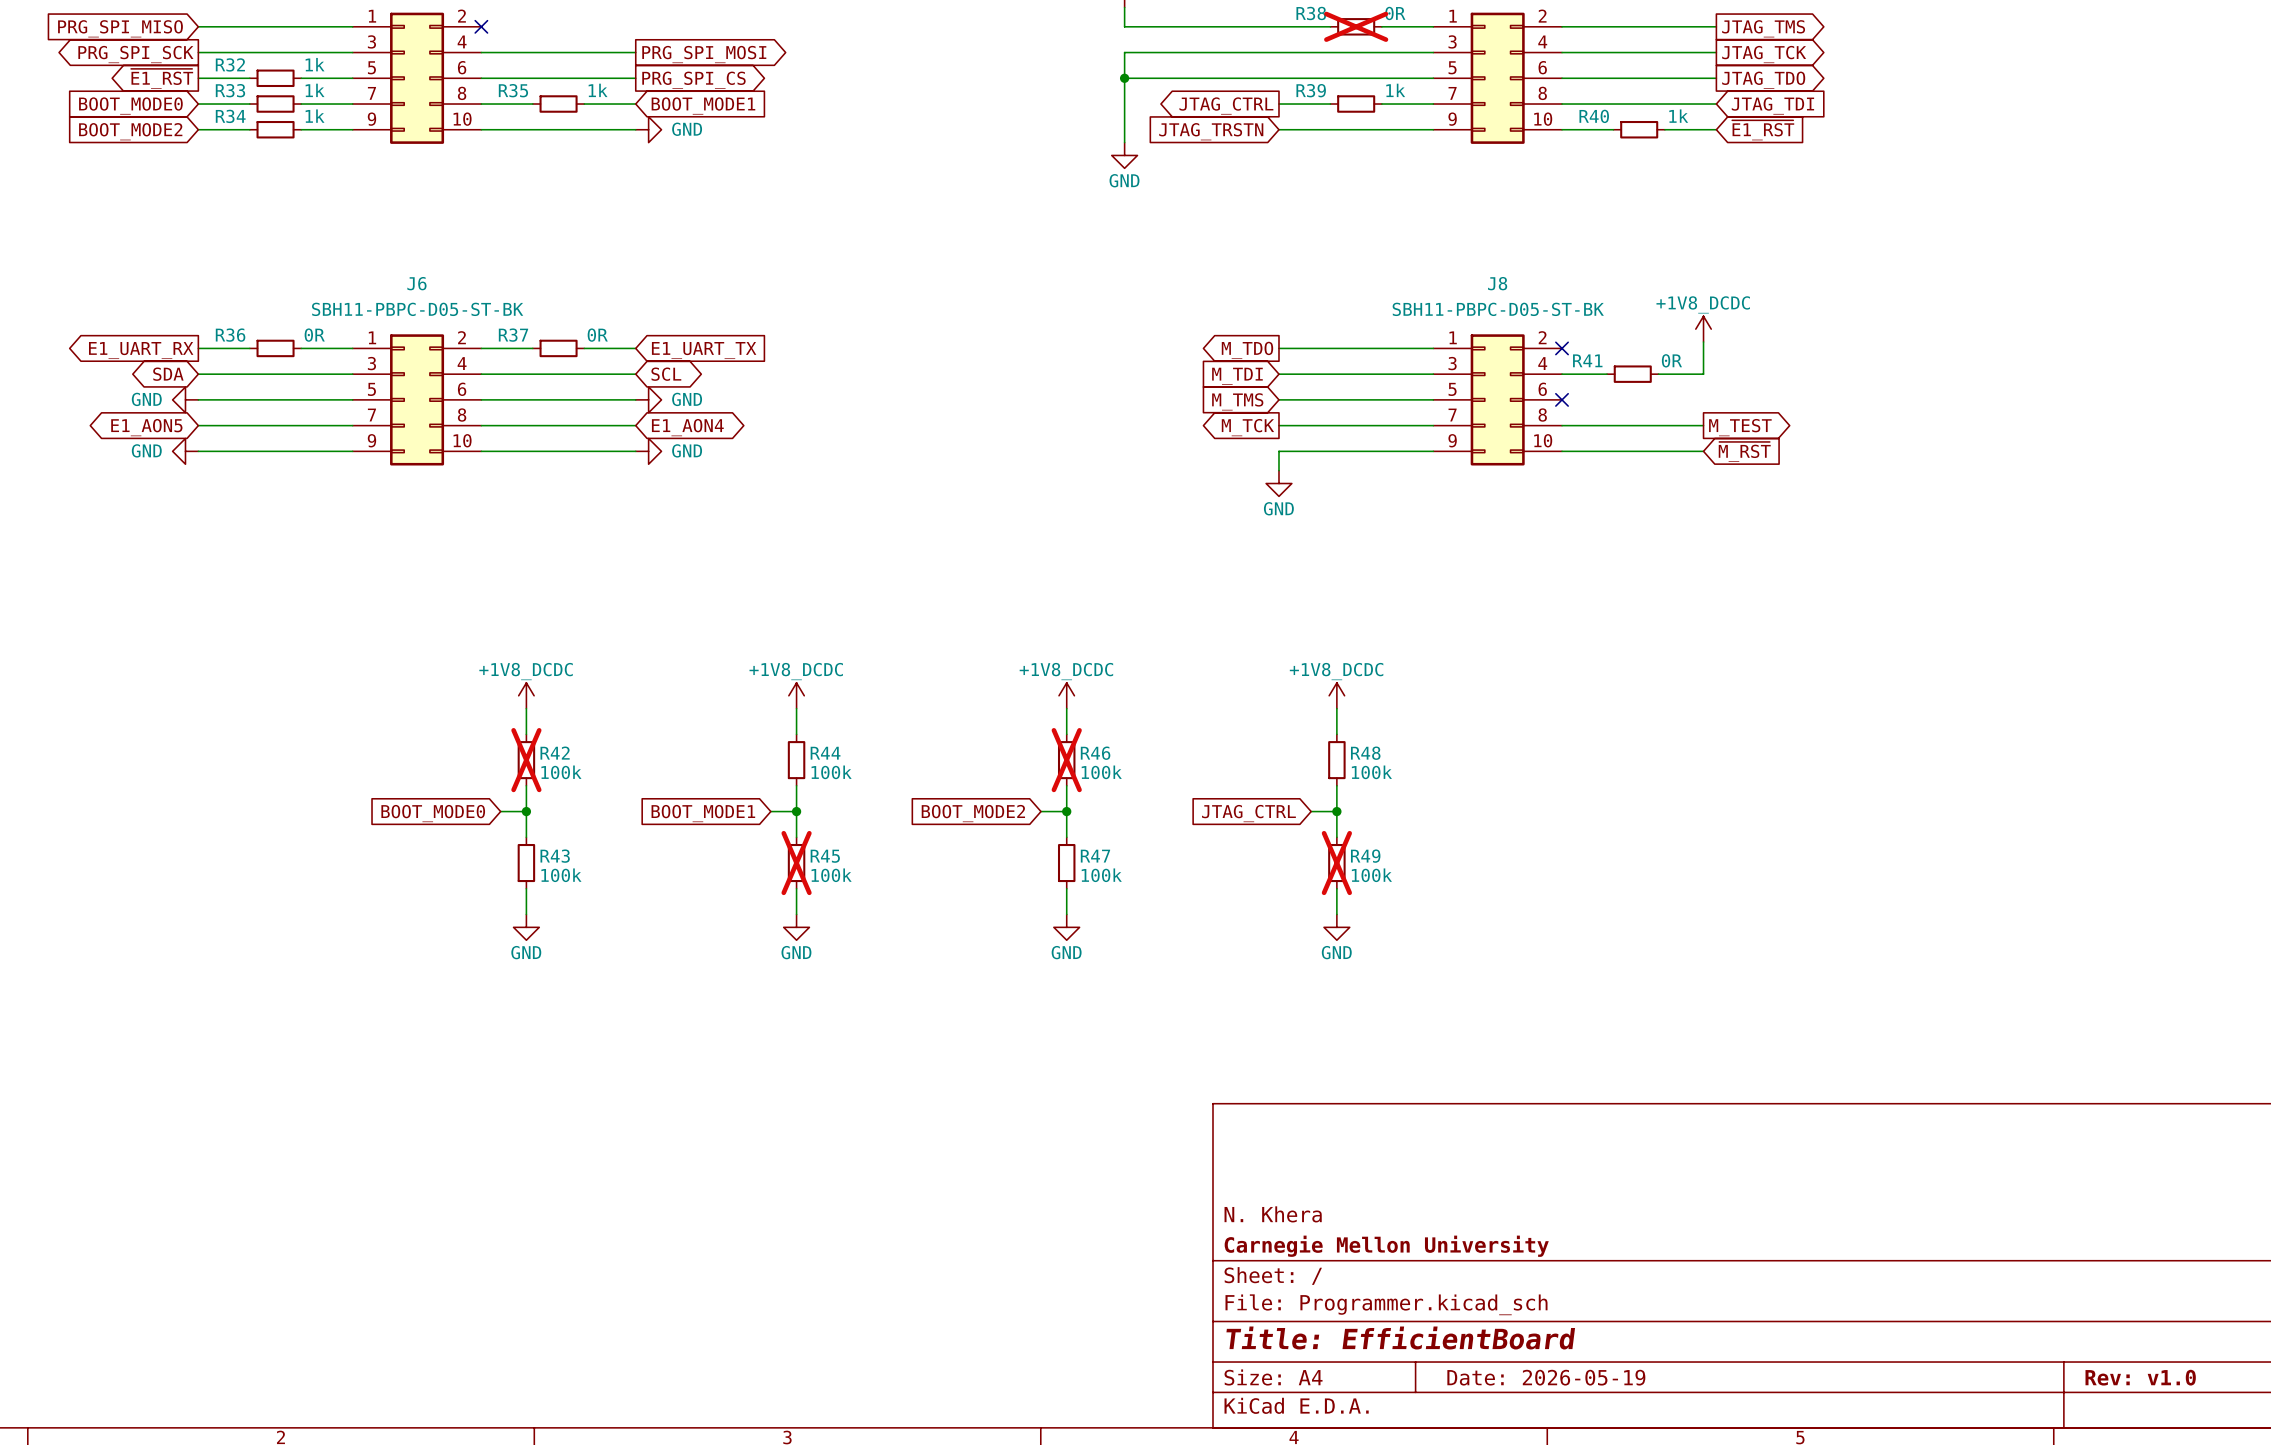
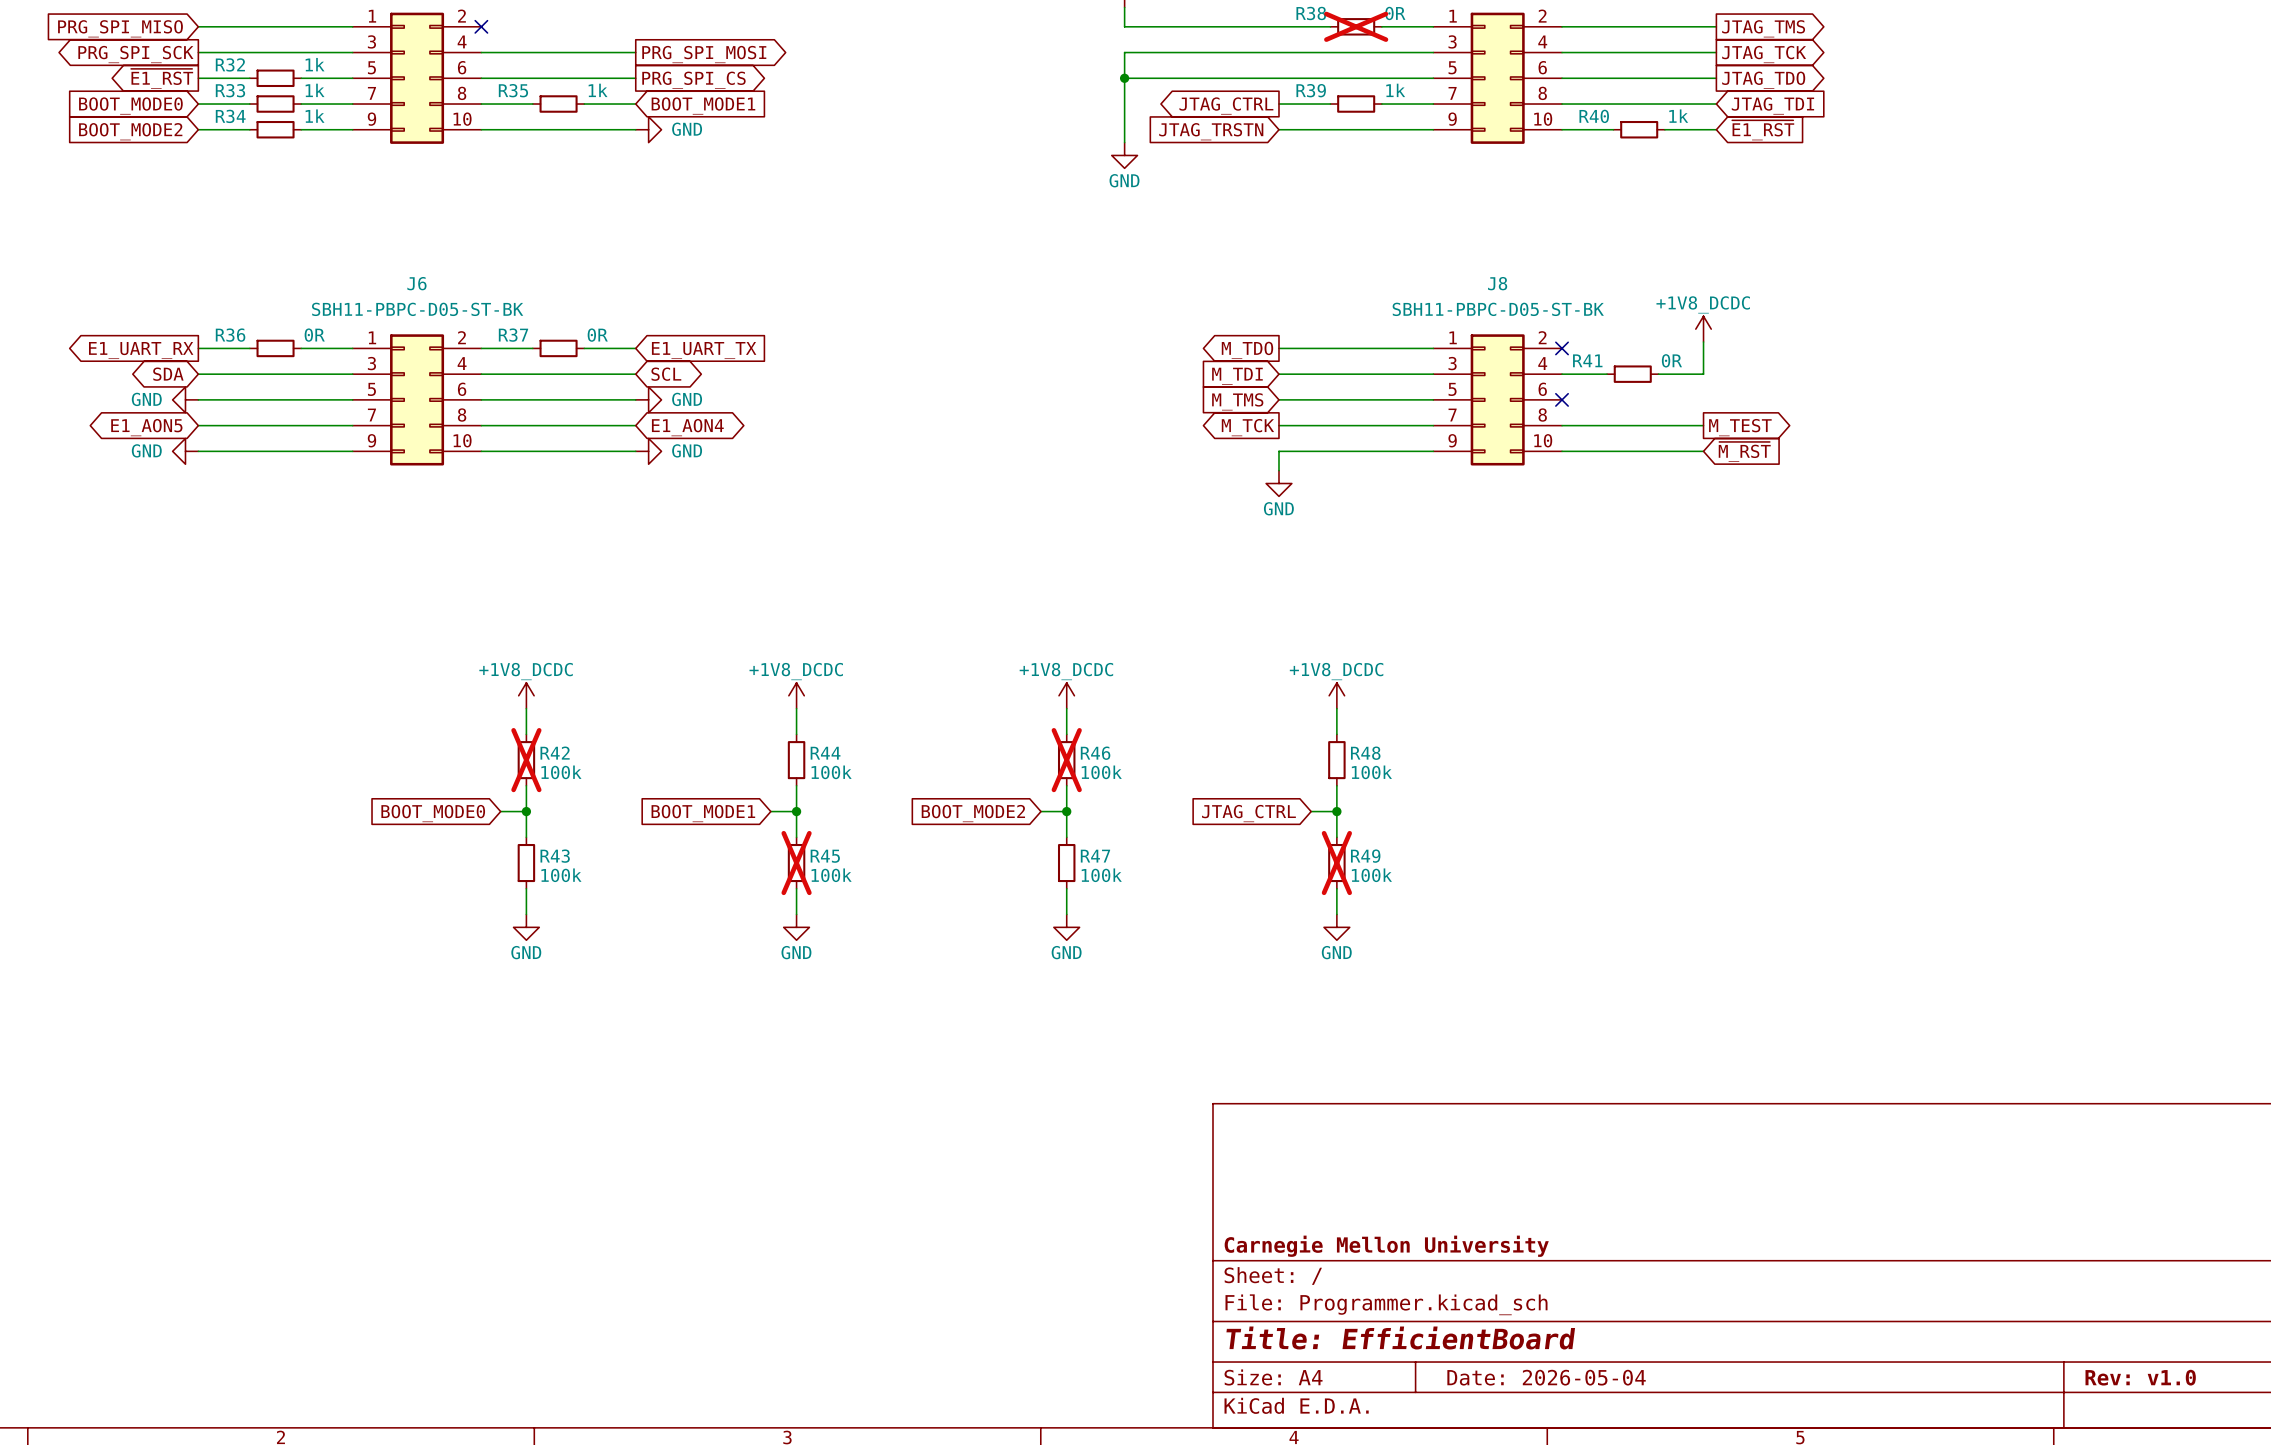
title block: N. Khera (1273, 1214) -> none
title block: Date: 2026-05-19 (1546, 1377) -> Date: 2026-05-04 (1546, 1377)

